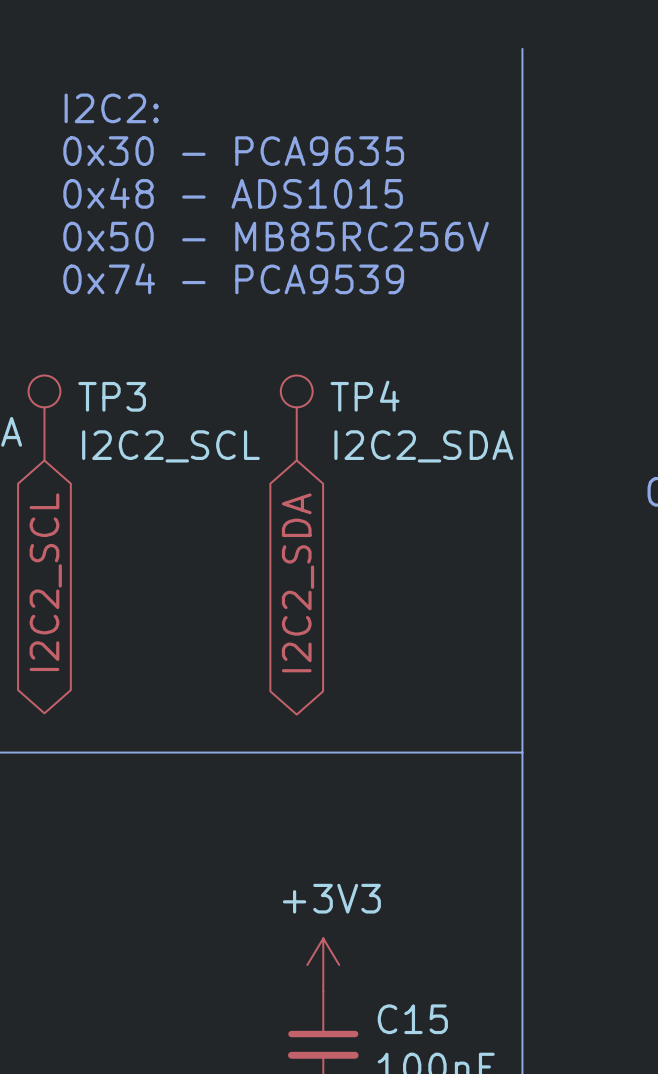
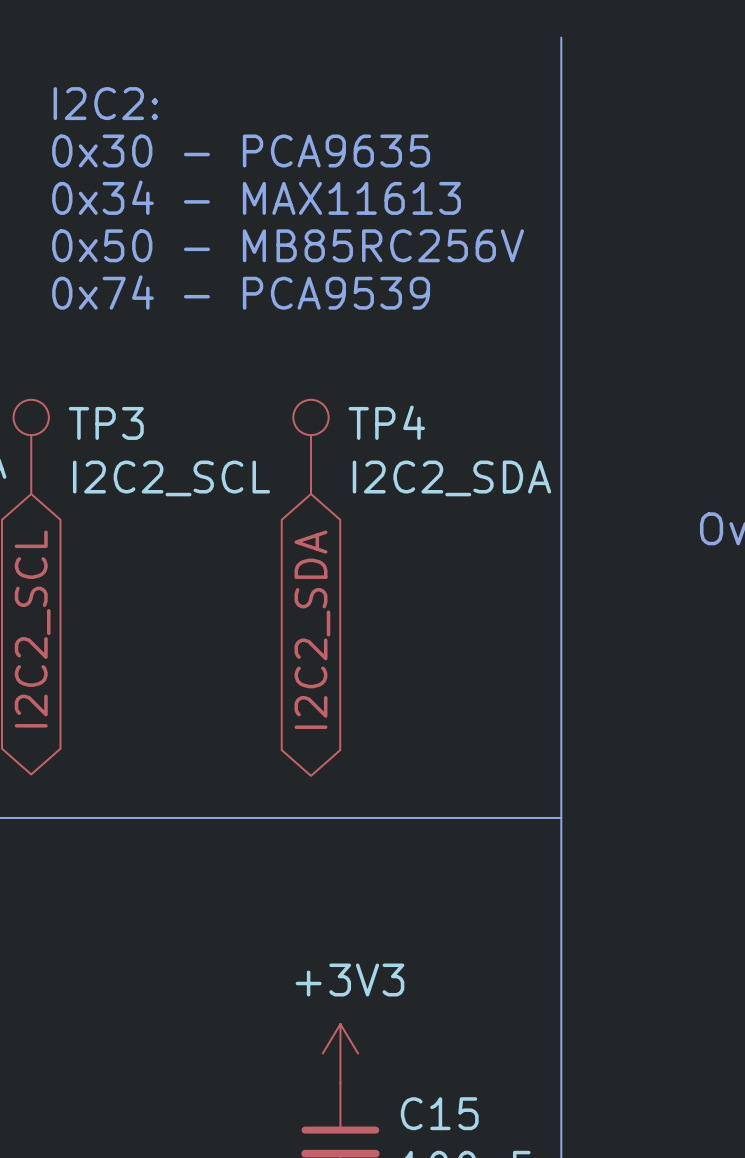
text: 0x48 - ADS1015 (233, 193) -> 0x34 - MAX11613 (256, 197)

